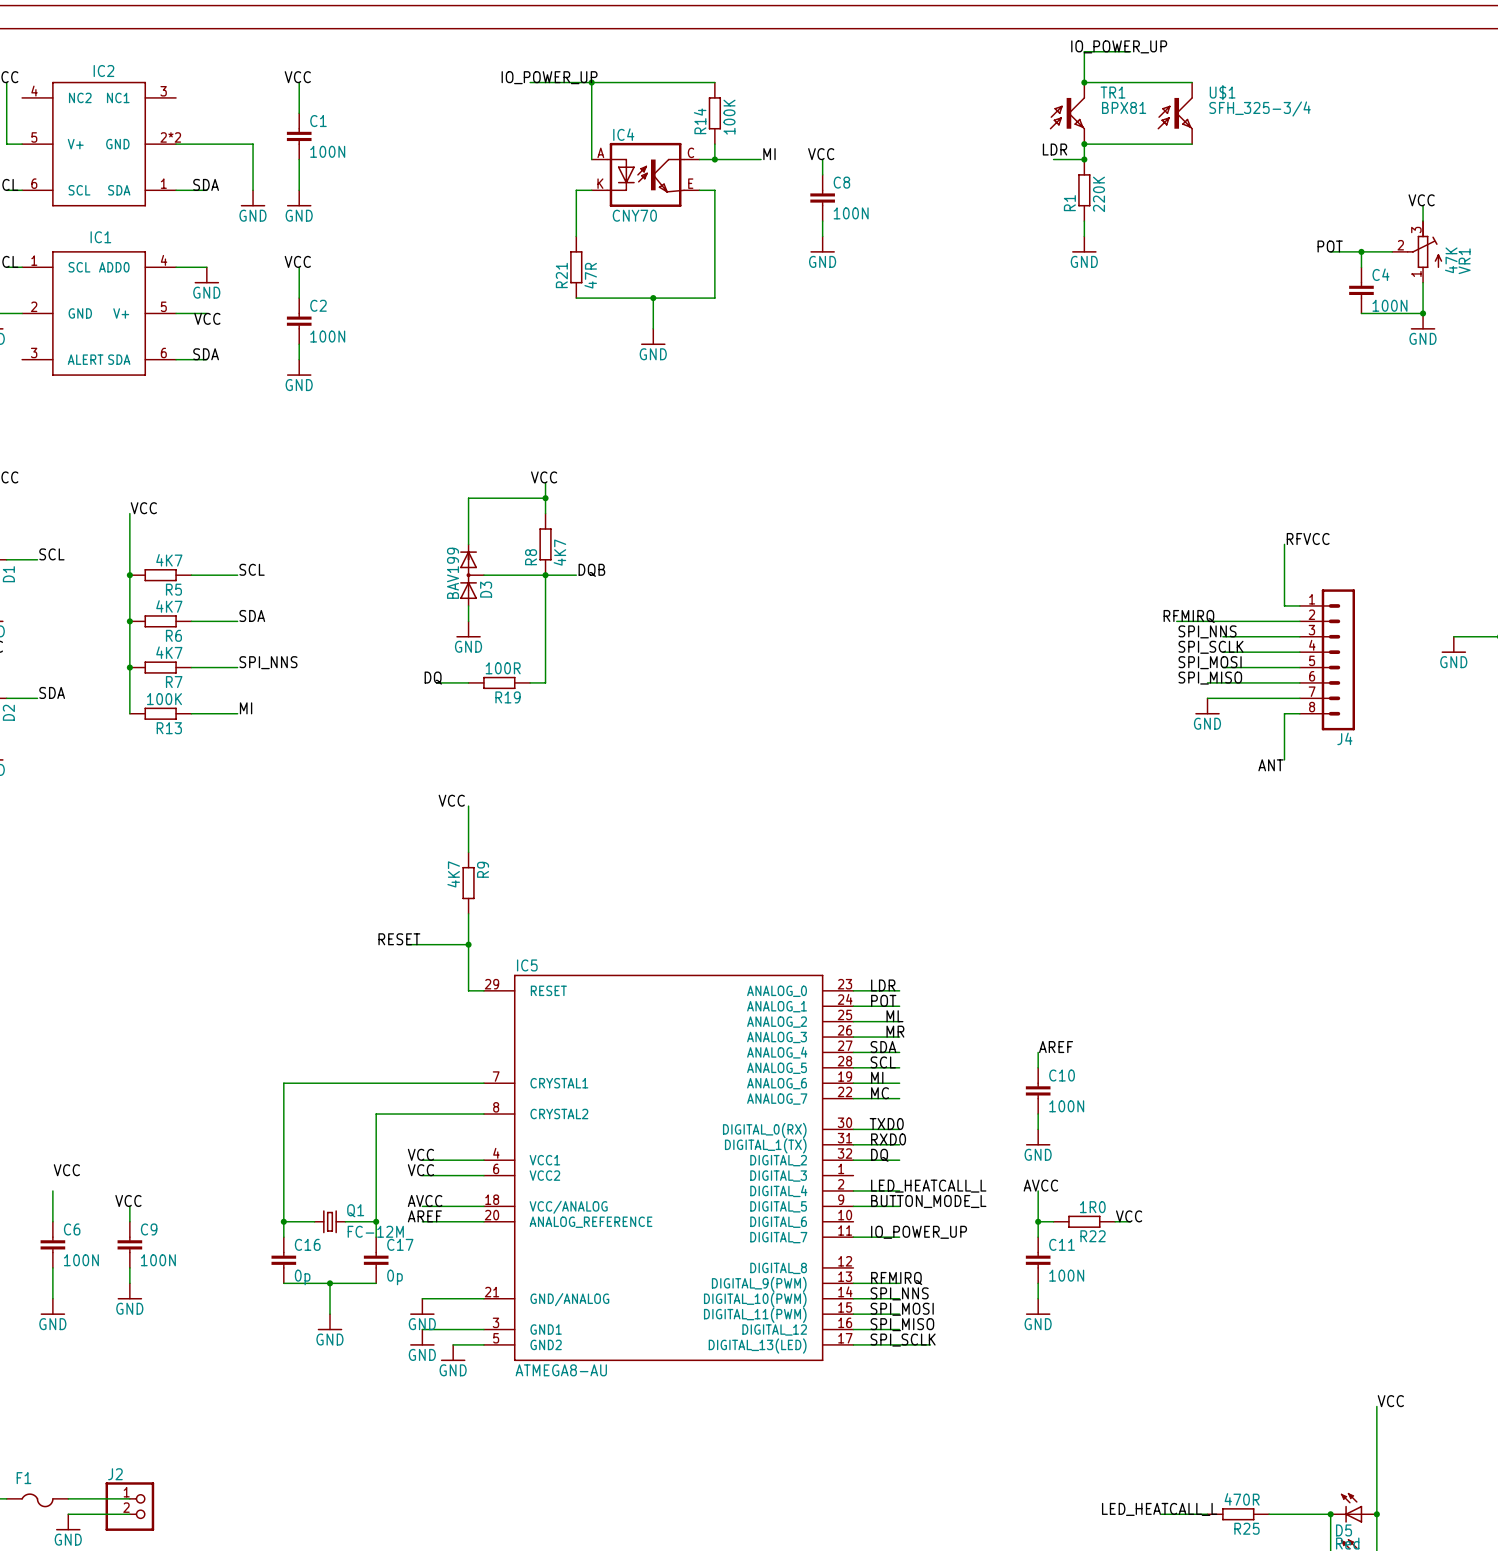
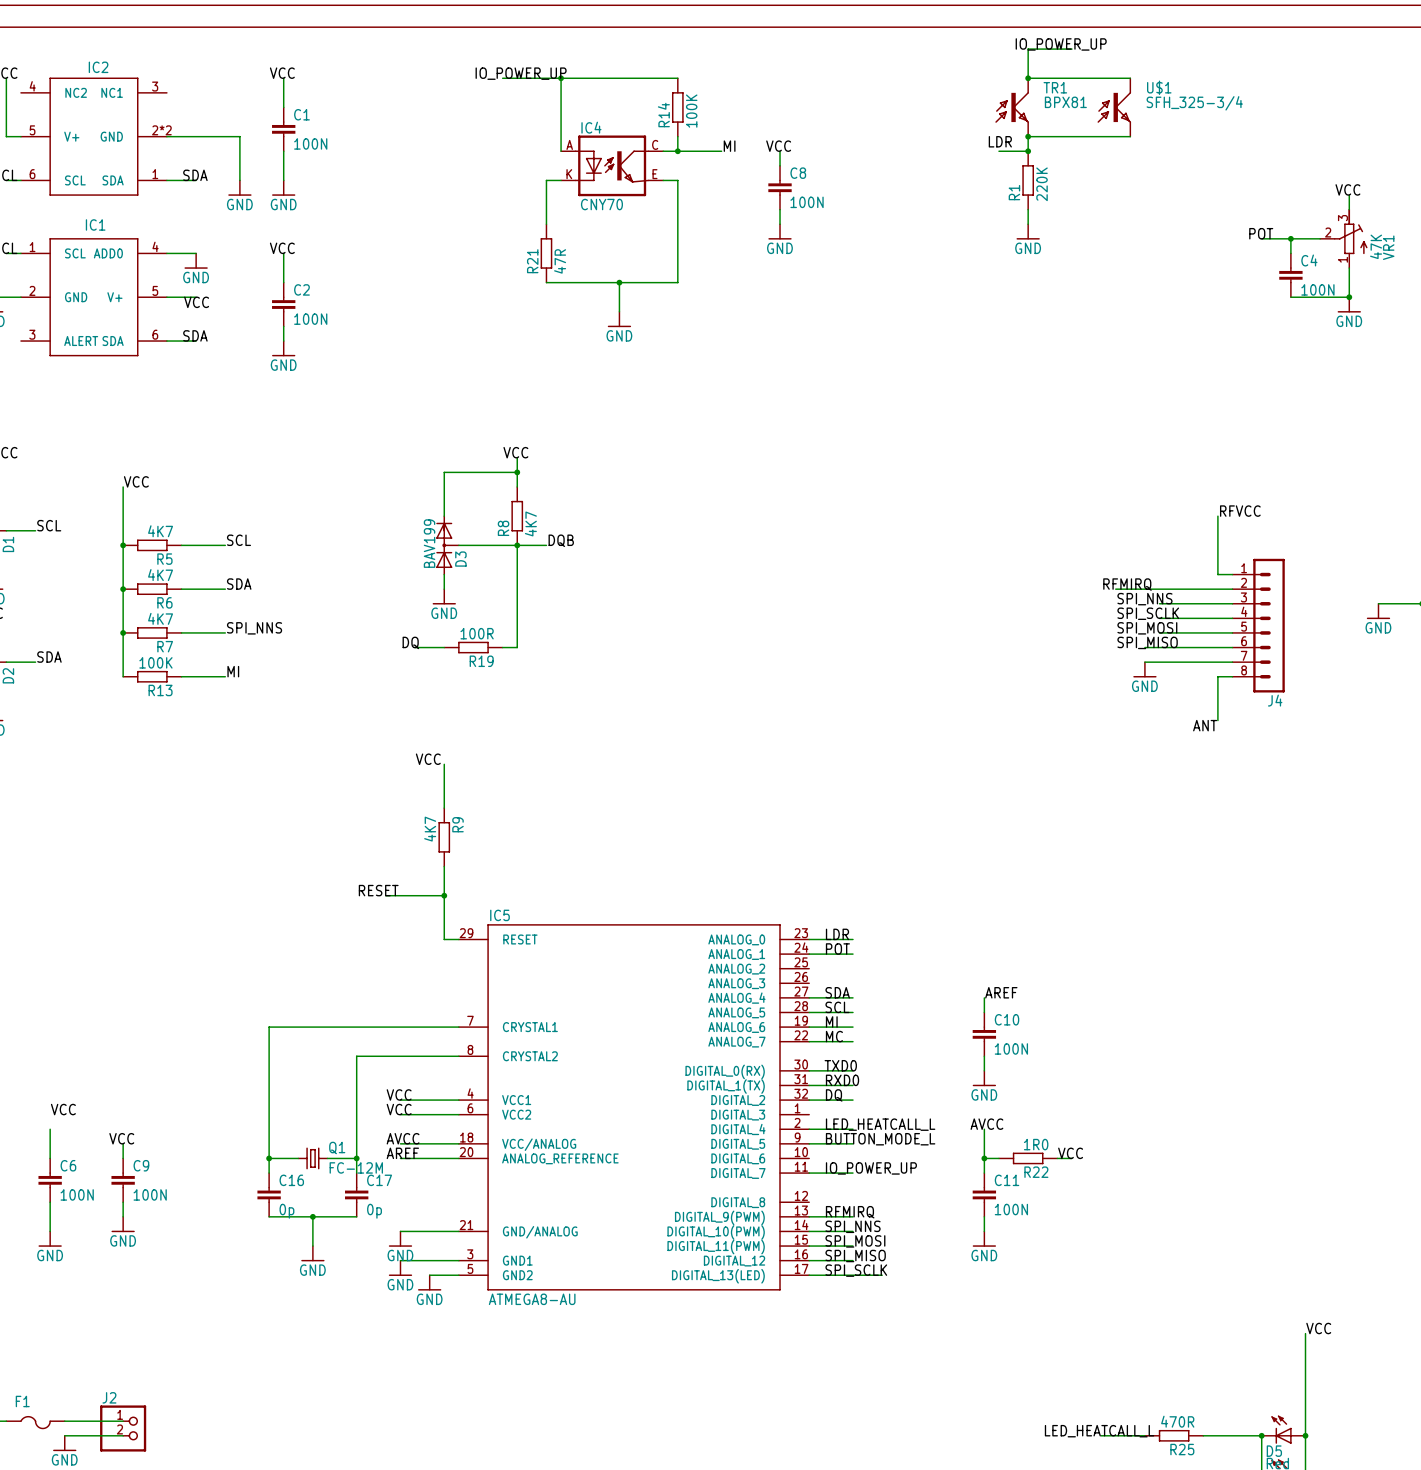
label: ML (894, 1016) -> none
wire: (853, 1021) (899, 1021) -> none
label: MR (895, 1031) -> none
wire: (853, 1037) (899, 1037) -> none

